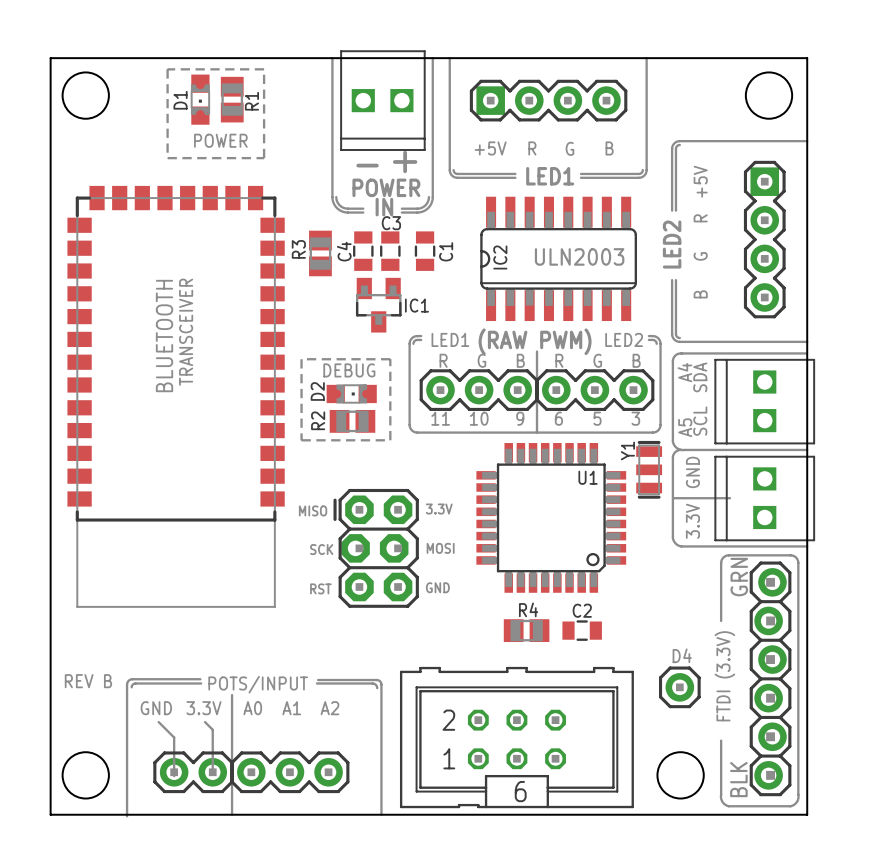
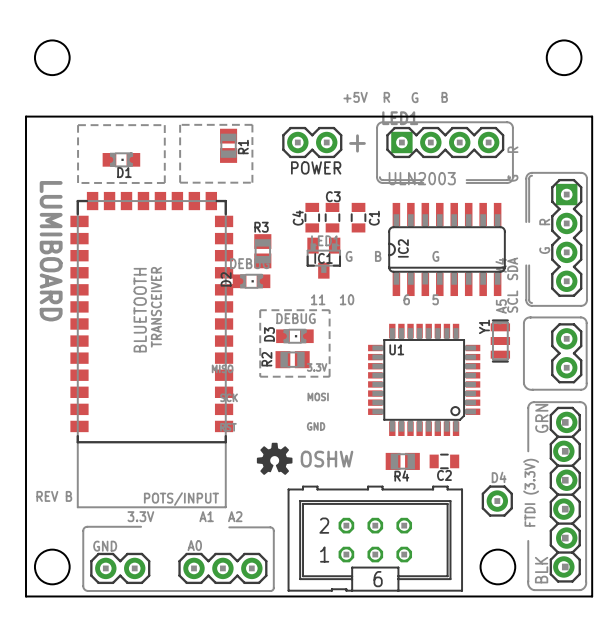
line: (332, 58) (332, 201) (336, 208) (341, 211) (363, 212) -> none
line: (432, 58) (432, 201) (428, 208) (423, 211) (401, 212) -> none
line: (449, 58) (450, 173) (457, 177) (515, 177) -> none
line: (646, 58) (645, 173) (638, 177) (581, 177) -> none
line: (167, 69) (264, 69) (264, 158) (167, 158) (167, 69) -> none
D1 rotation: 0° (200, 99) -> 90° counterclockwise (121, 159)
D1 position: (200, 99) -> (121, 159)
R1 position: (232, 99) -> (228, 145)
part: (382, 100) -> none
part: (548, 100) -> none
text: POWER (220, 140) -> none
line: (807, 141) (675, 142) (672, 148) (672, 210) -> none
line: (679, 145) (675, 148) (675, 210) -> none
text rotation: 0° (405, 161) -> 90° clockwise (357, 143)
text position: + (405, 161) -> + (357, 143)
text: - (367, 165) -> none
line: (453, 170) (457, 173) (515, 173) -> none
line: (642, 170) (638, 173) (581, 173) -> none
board edge: (50, 174) (50, 58) (807, 58) (806, 814) -> (25, 116) (592, 116) (592, 596)
text: +5V (700, 181) -> none
line: none -> (78, 125) (164, 125) (164, 182) (78, 182) (78, 125)
line: none -> (180, 124) (252, 124) (252, 182) (180, 182) (180, 124)
text: POWER (386, 187) -> none
line: (336, 197) (337, 202) (343, 207) (363, 208) -> none
line: (428, 197) (427, 202) (421, 207) (401, 208) -> none
text: IN (384, 207) -> none
POWER: none -> (312, 142)
part: none -> (445, 142)
part: (764, 239) -> none
text: LED2 (672, 244) -> none
R3 name rotation: 0° (298, 249) -> 90° clockwise (261, 227)
R3 name position: R3 (298, 249) -> R3 (261, 227)
C4 position: (363, 251) -> (312, 217)
C3 position: (390, 251) -> (332, 217)
C1 position: (425, 251) -> (358, 217)
R3 position: (320, 253) -> (262, 251)
line: none -> (532, 175) (529, 178) (529, 222)
line: none -> (379, 177) (382, 180) (423, 180)
line: none -> (510, 177) (507, 180) (466, 180)
IC2 position: (558, 258) -> (447, 249)
line: none -> (423, 182) (382, 182) (378, 180) (377, 128) (379, 123) (510, 123) (512, 128) (511, 180) (507, 182) (466, 182)
line: (672, 280) (672, 335) (676, 341) (807, 341) -> none
line: (675, 280) (676, 334) (679, 338) -> none
text: B (700, 294) -> none
IC1 position: (378, 305) -> (323, 258)
IC1 name position: IC1 (416, 305) -> IC1 (323, 258)
line: none -> (526, 222) (526, 178) (528, 174) (581, 172) (585, 175) (586, 302) (581, 305) (529, 305) (526, 300) (526, 265)
text: none -> R (544, 222)
text position: TRANSCEIVER (186, 332) -> TRANSCEIVER (156, 307)
text position: BLUETOOTH (164, 336) -> BLUETOOTH (140, 310)
line: (421, 336) (413, 337) (409, 342) (409, 424) (414, 431) (652, 432) (657, 430) (660, 425) (660, 343) (656, 337) (648, 336) -> none
part: none -> (566, 237)
line: (421, 339) (415, 340) (413, 343) -> none
text: LED2 (624, 339) -> none
line: (648, 339) (654, 340) (656, 343) -> none
text: (RAW PWM) (535, 341) -> none
line: (537, 351) (537, 432) -> none
text: none -> G (544, 250)
text: none -> LUMIBOARD (51, 251)
line: (806, 353) (680, 353) (674, 356) (672, 441) (675, 447) (681, 449) (675, 451) (672, 457) (672, 537) (675, 543) (681, 546) (807, 546) -> none
line: (301, 359) (390, 359) (390, 440) (301, 440) (301, 359) -> none
text: R (443, 360) -> none
text: R (559, 360) -> none
text: B (636, 360) -> none
line: none -> (529, 265) (529, 300) (532, 302)
part: (479, 390) -> none
part: (594, 390) -> none
part position: (176, 396) -> (151, 349)
part: (764, 401) -> none
text: 9 (520, 418) -> none
text: 3 (635, 418) -> none
R2 position: (352, 421) -> (292, 359)
line: none -> (260, 310) (329, 310) (329, 376) (260, 376) (260, 310)
line: (685, 449) (807, 449) -> none
part footprint: [714, 455, 816, 542] -> [551, 323, 583, 384]
D3: none -> DEBUG (294, 336)
Y1 position: (649, 469) -> (500, 341)
text: GND (692, 472) -> none
U1 name position: U1 (588, 477) -> U1 (396, 349)
line: (674, 498) (730, 498) -> none
U1 position: (551, 517) -> (424, 379)
text: 3.3V (692, 521) -> none
line: none -> (532, 389) (526, 388) (523, 383) (524, 320) (529, 317) (584, 318) (586, 323) (585, 387) (581, 389) (533, 389)
part: (376, 548) -> none
drawing: none -> [256, 442, 293, 475]
R4 name position: R4 (528, 609) -> R4 (401, 475)
C2 name position: C2 (582, 610) -> C2 (444, 475)
R4 position: (526, 630) -> (402, 461)
C2 position: (582, 630) -> (444, 461)
text: none -> OSHW (327, 459)
line: (200, 679) (129, 679) (127, 684) (127, 727) -> (141, 526) (86, 526) (83, 530)
line: (318, 680) (379, 680) (381, 684) (381, 727) -> (229, 527) (270, 527) (273, 530)
line: (201, 683) (135, 683) (131, 687) -> none
line: (316, 683) (373, 683) (377, 688) -> none
line: (232, 695) (232, 814) -> none
text position: GND (156, 708) -> GND (105, 546)
text position: A0 (252, 708) -> A0 (194, 545)
line: (158, 722) (174, 737) (174, 776) -> none
line: (205, 722) (212, 729) (212, 772) -> none
part position: (193, 772) -> (120, 568)
part position: (289, 772) -> (222, 568)
line: (127, 800) (127, 816) -> (83, 586) (88, 590) (270, 590) (273, 587)
line: (381, 803) (381, 814) -> none

